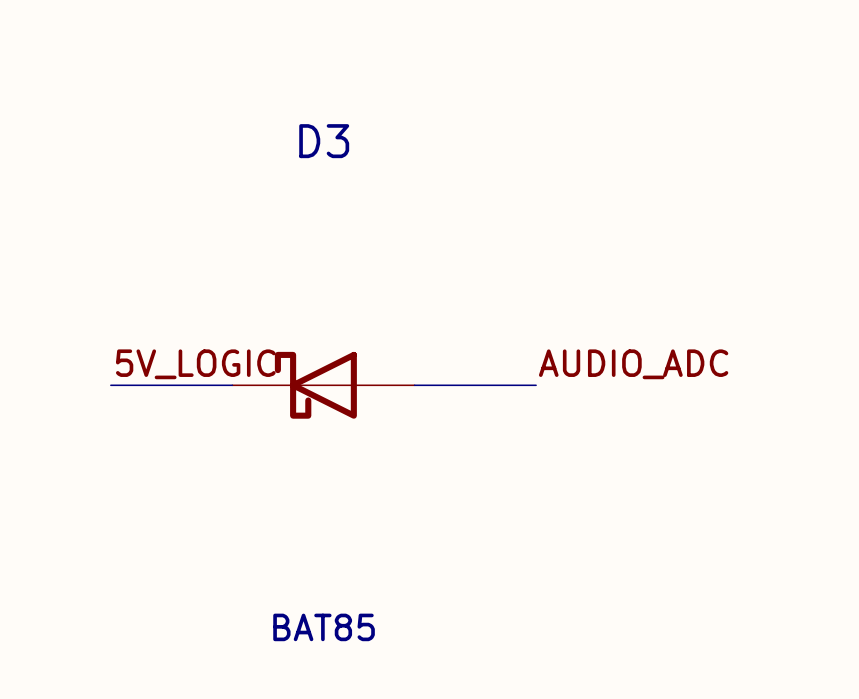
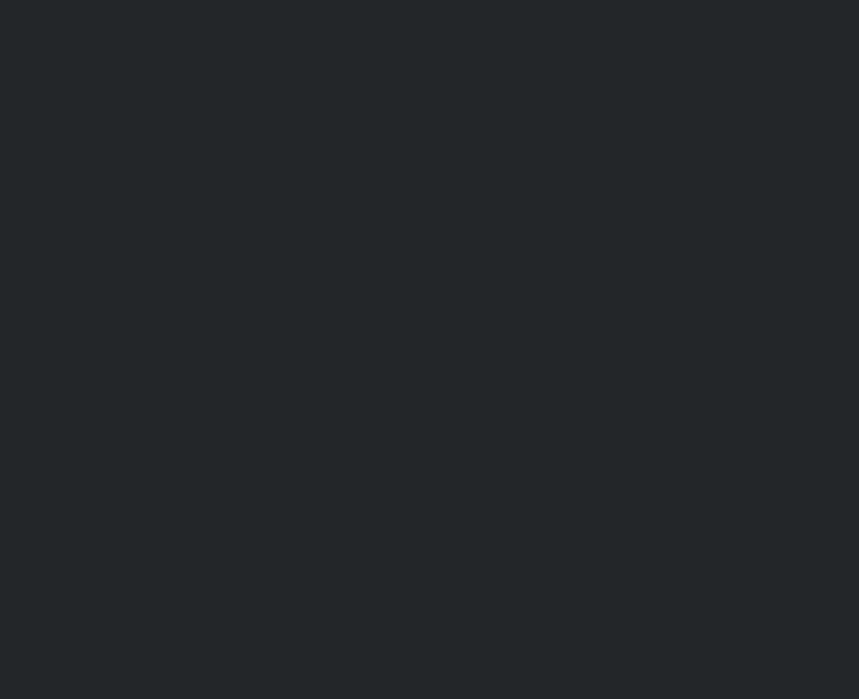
label: 5V_LOGIC (195, 364) -> none
label: AUDIO_ADC (633, 364) -> none
wire: (110, 385) (232, 385) -> none
D3: BAT85 (323, 385) -> none
wire: (414, 385) (536, 385) -> none

